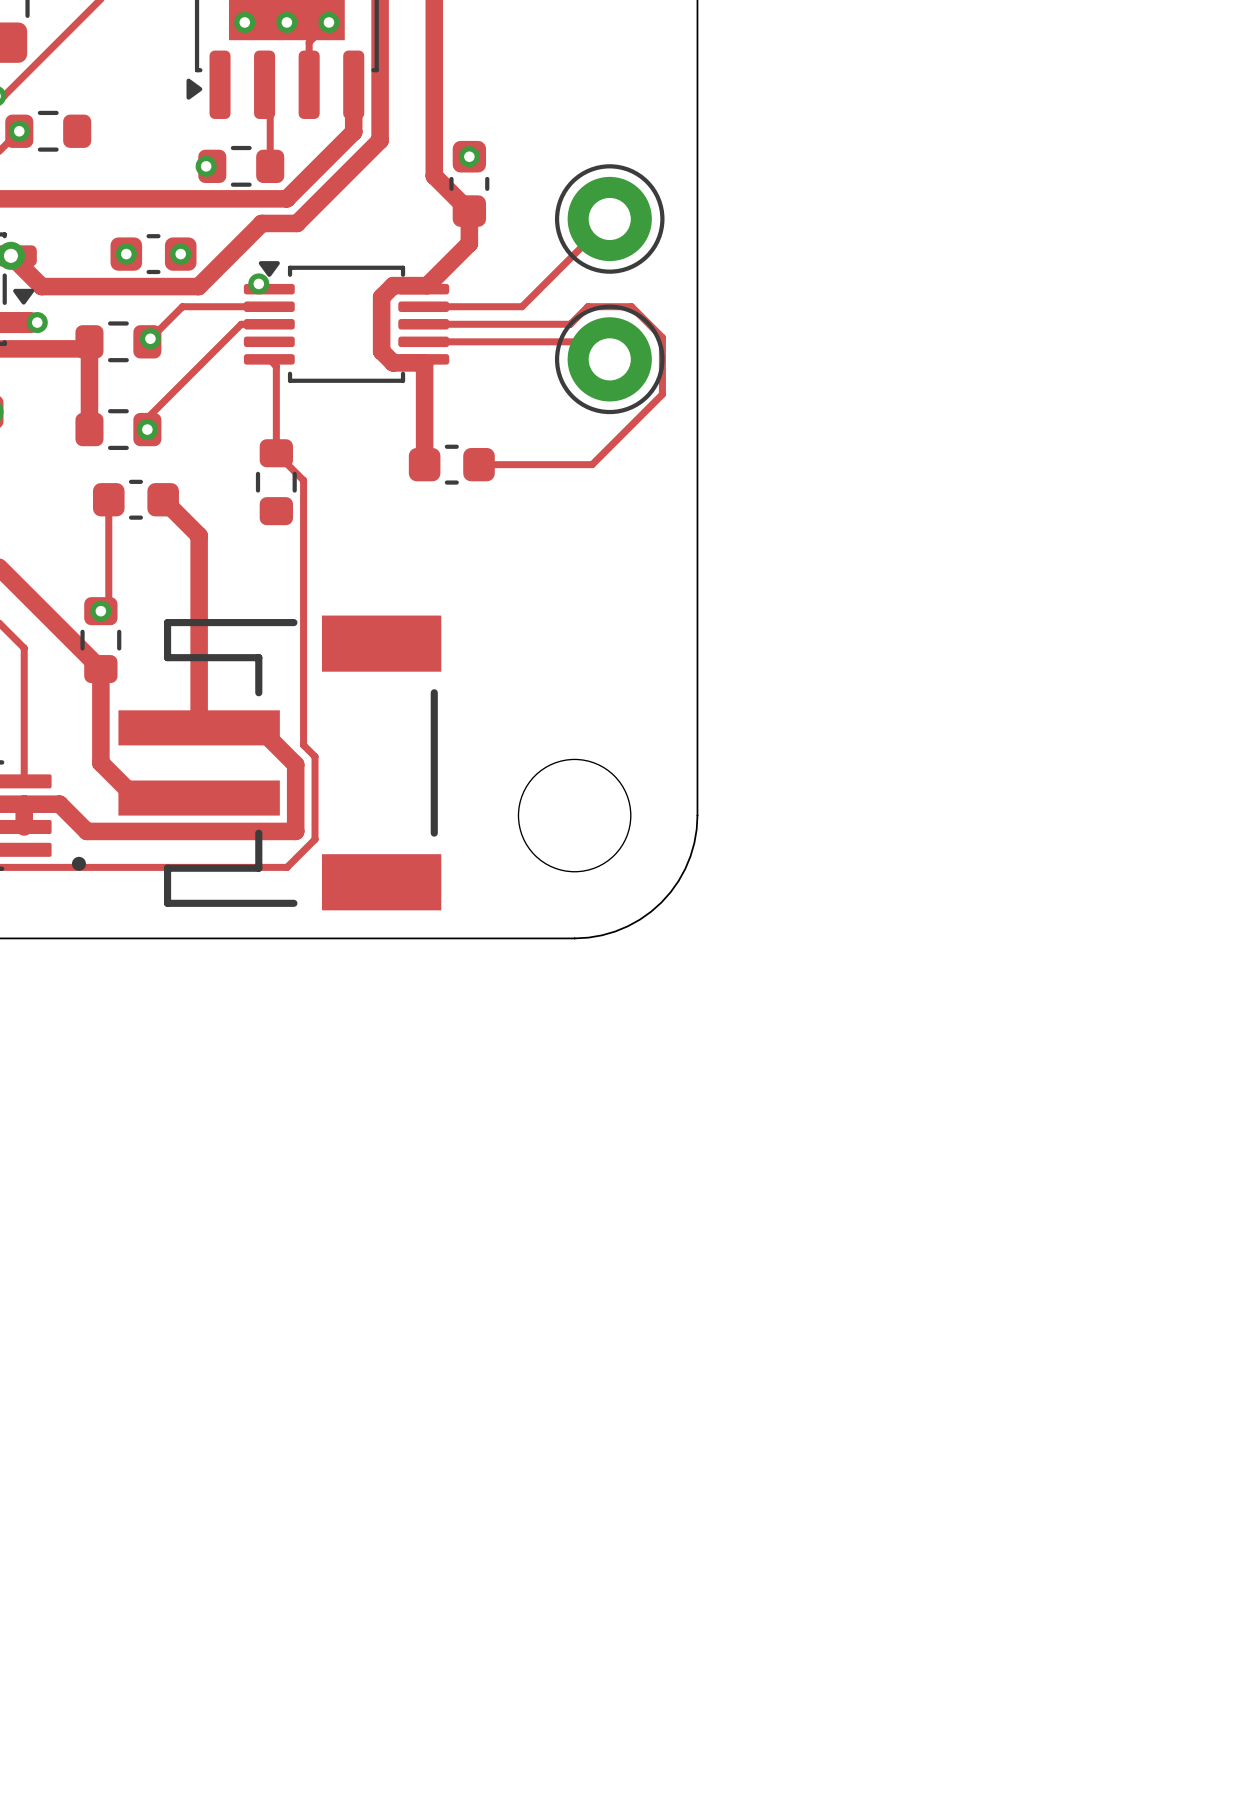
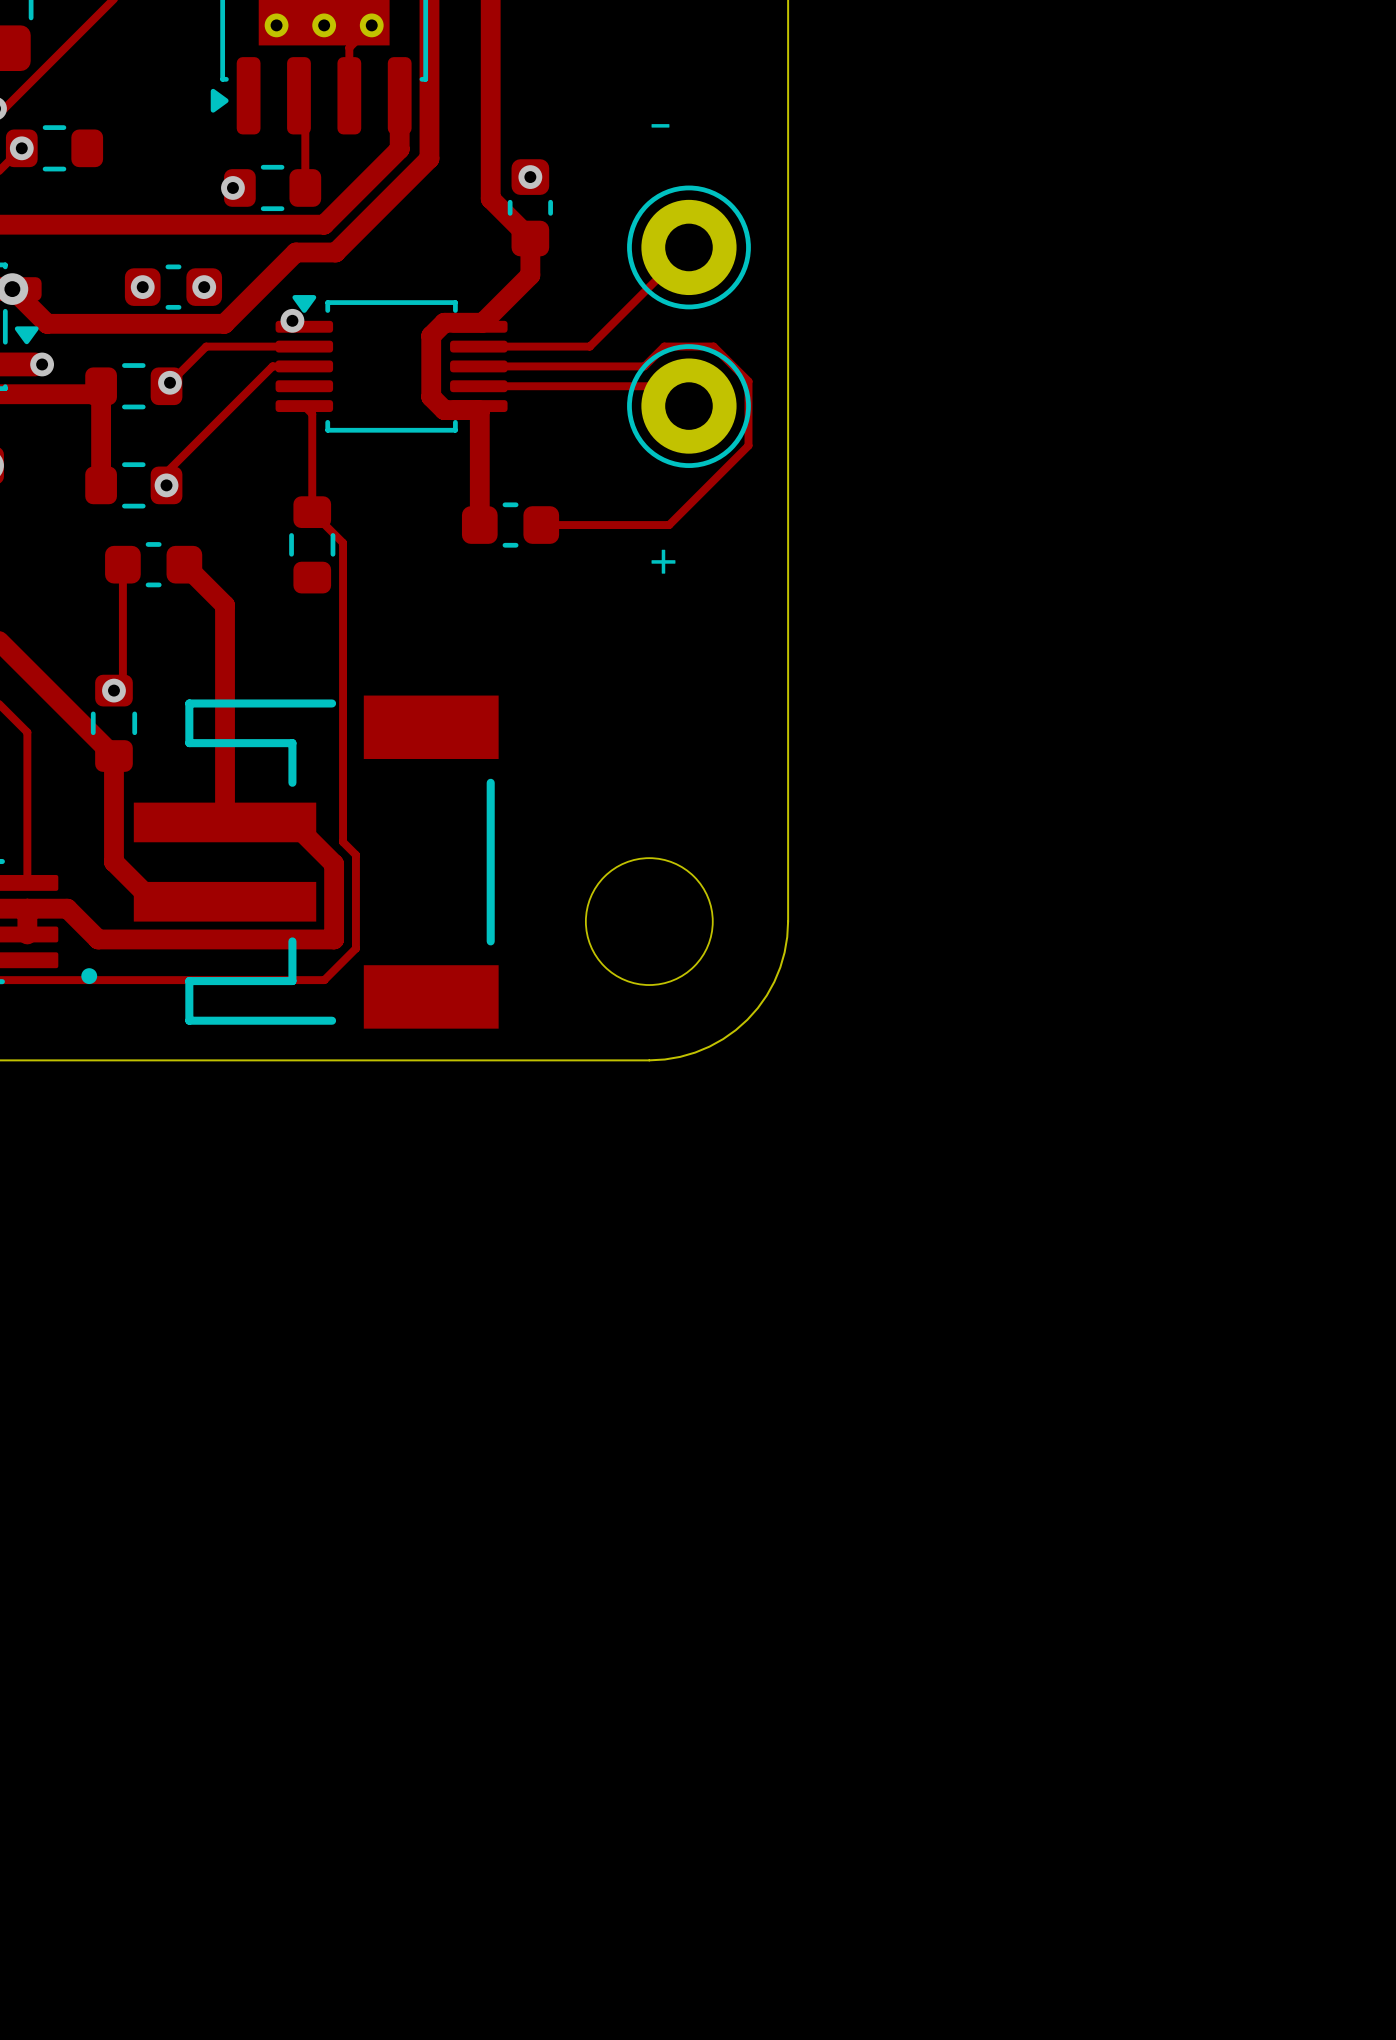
text: none -> - (660, 125)
text: none -> + (663, 561)

